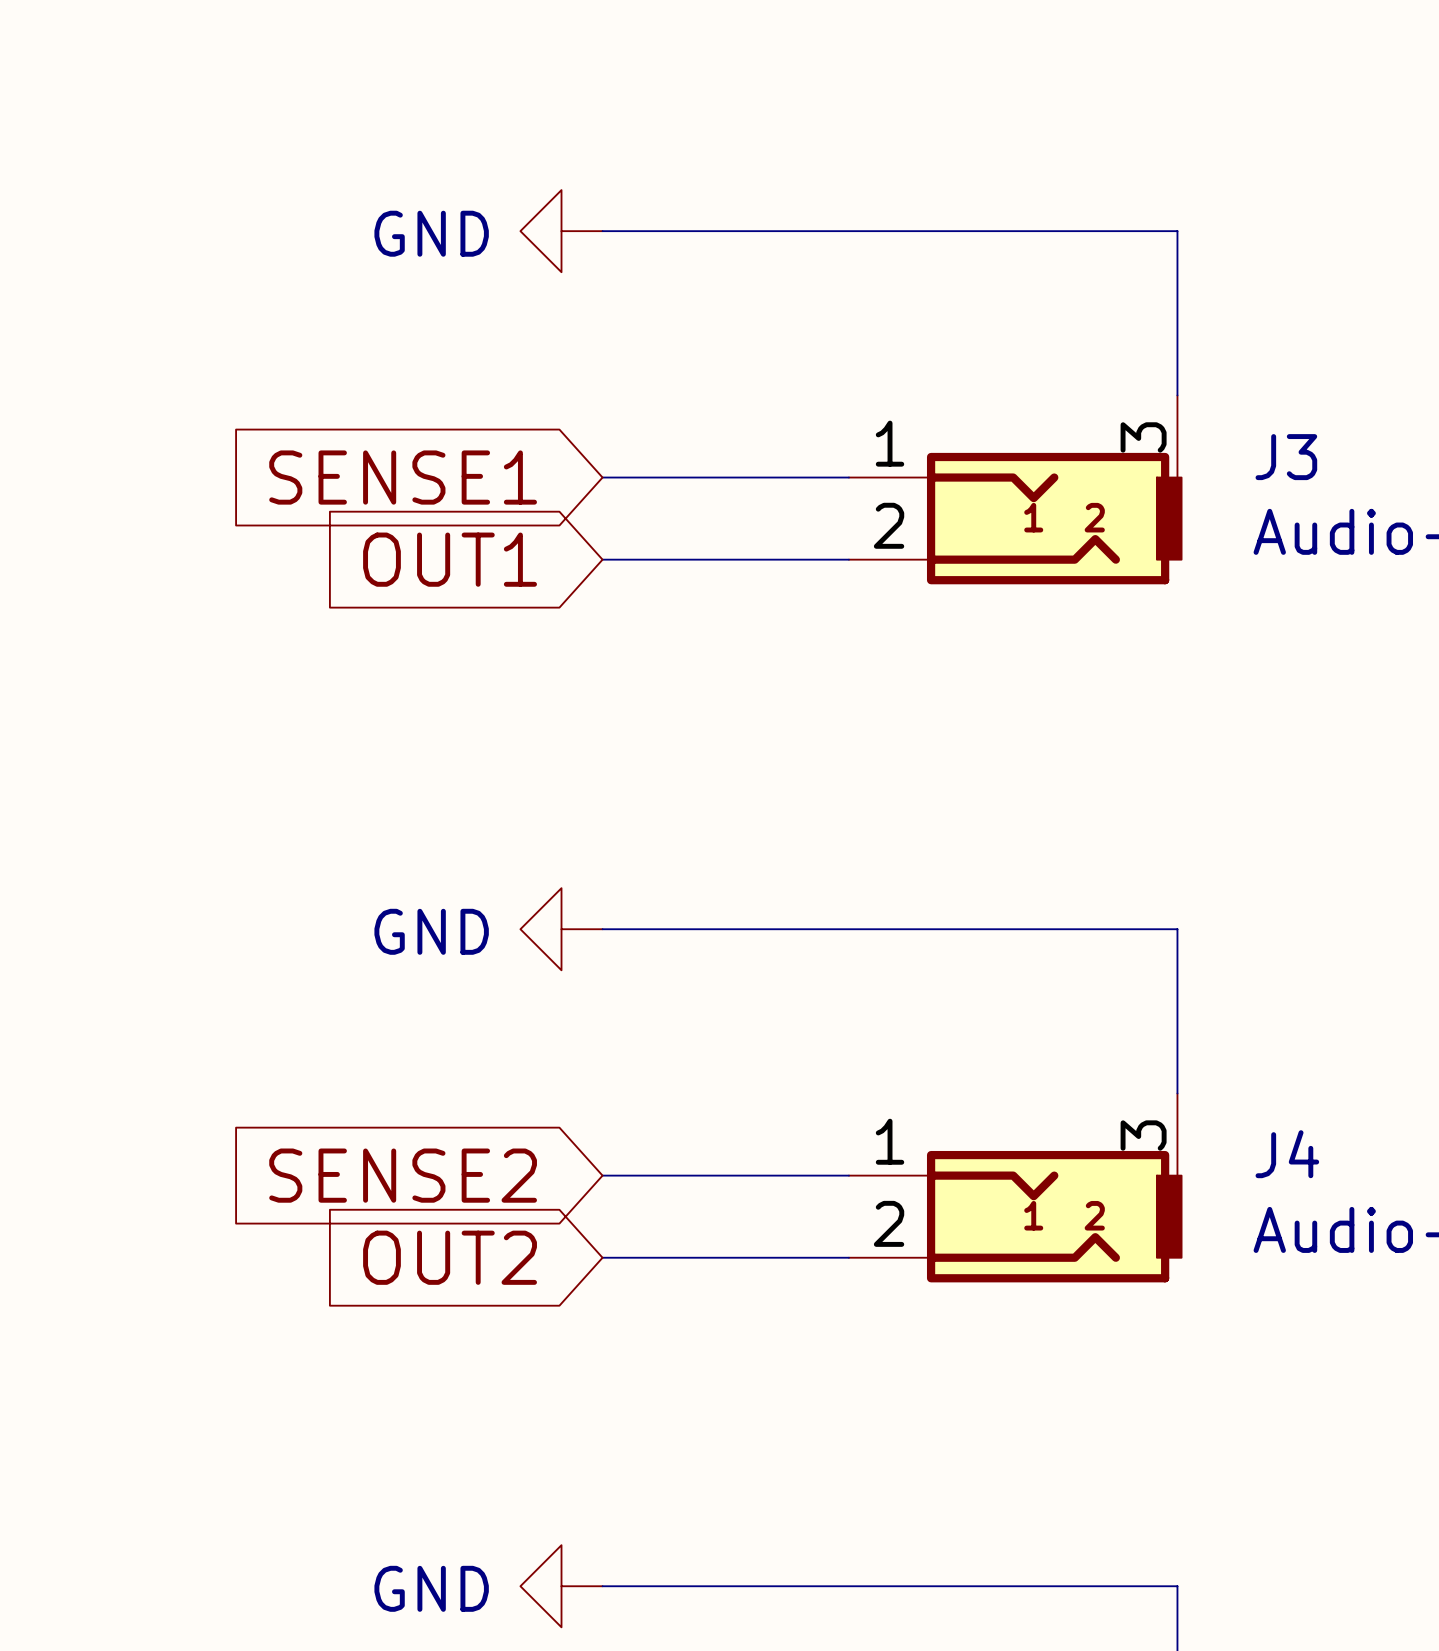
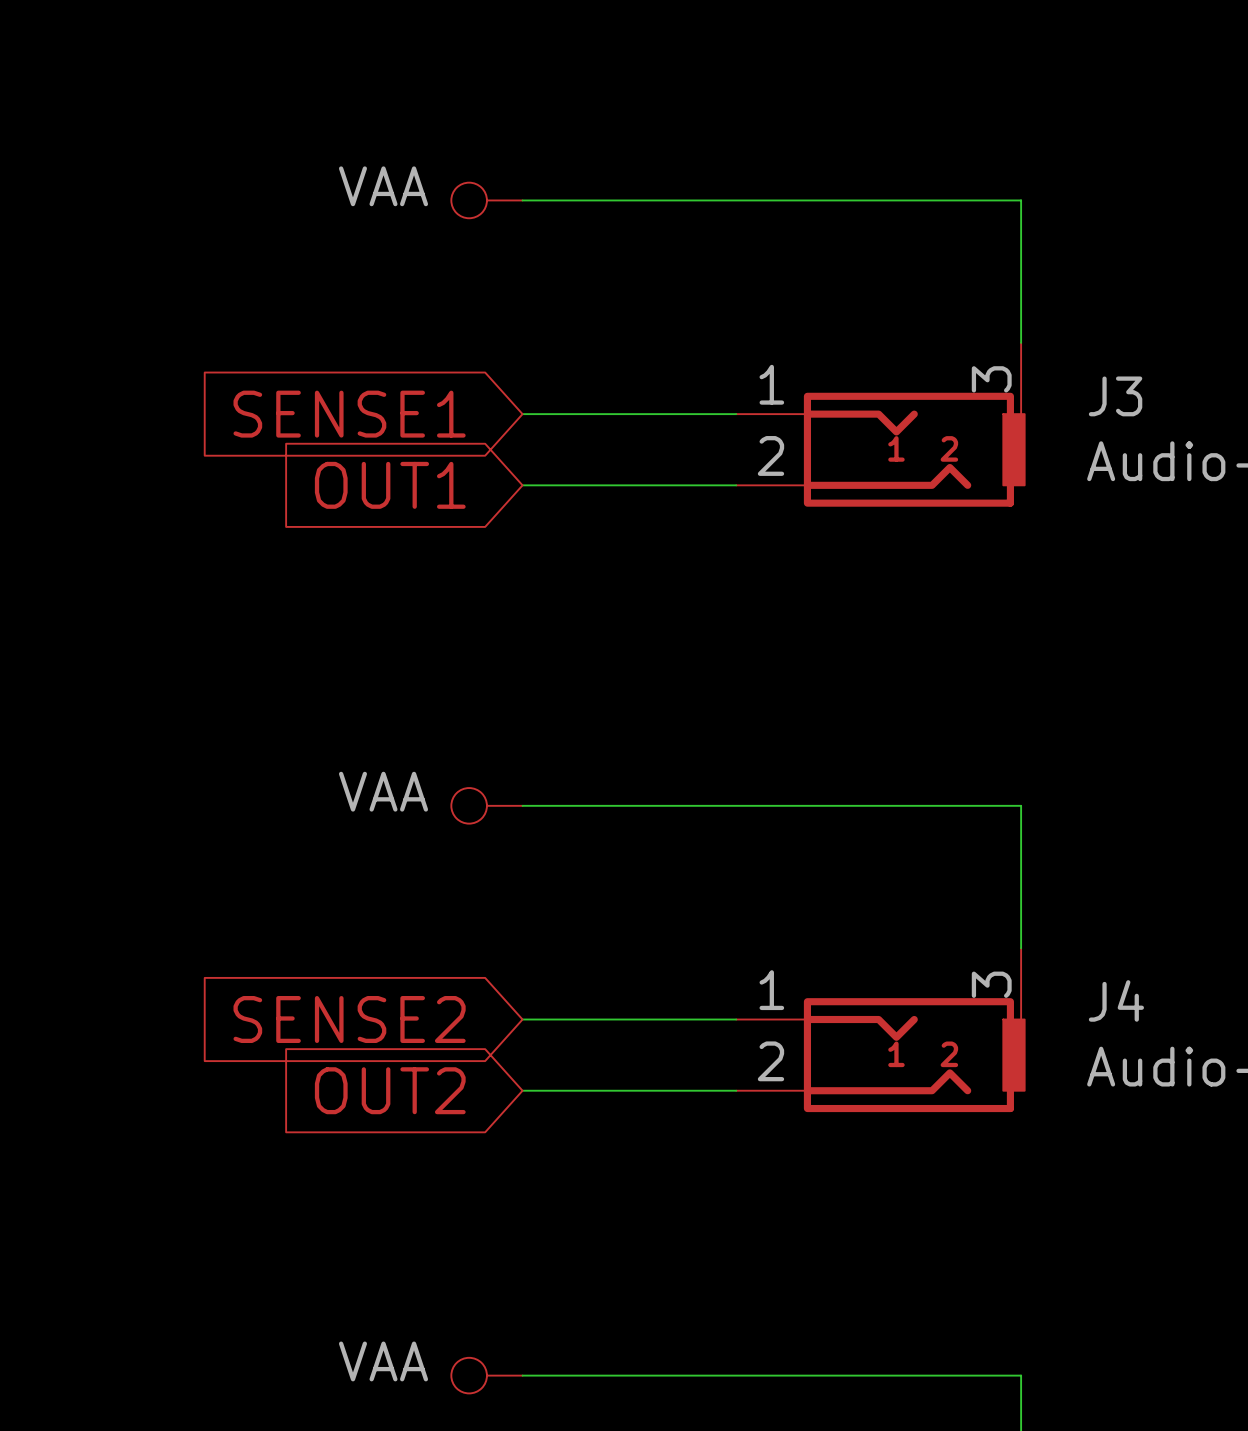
power symbol: GND (561, 231) -> VAA (486, 200)
power symbol: GND (561, 929) -> VAA (486, 805)
power symbol: GND (561, 1586) -> VAA (486, 1375)

